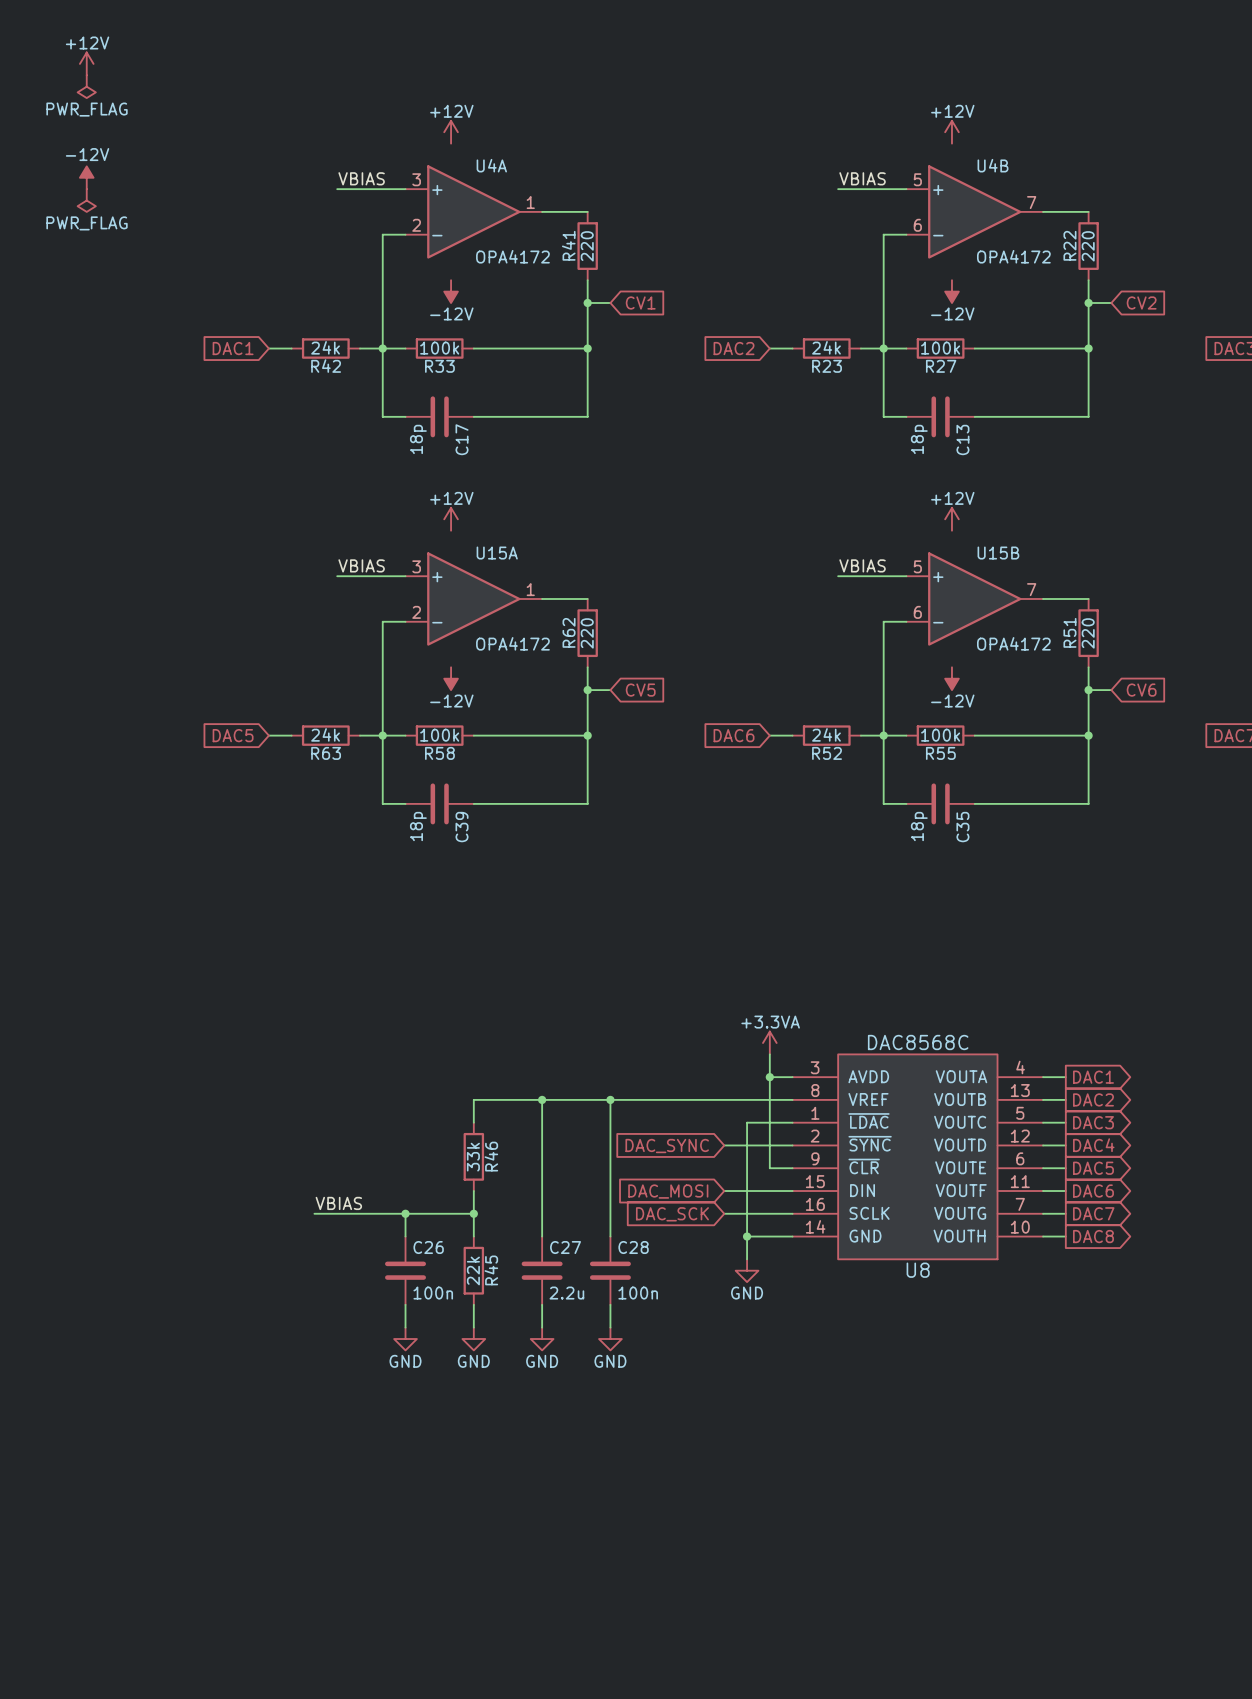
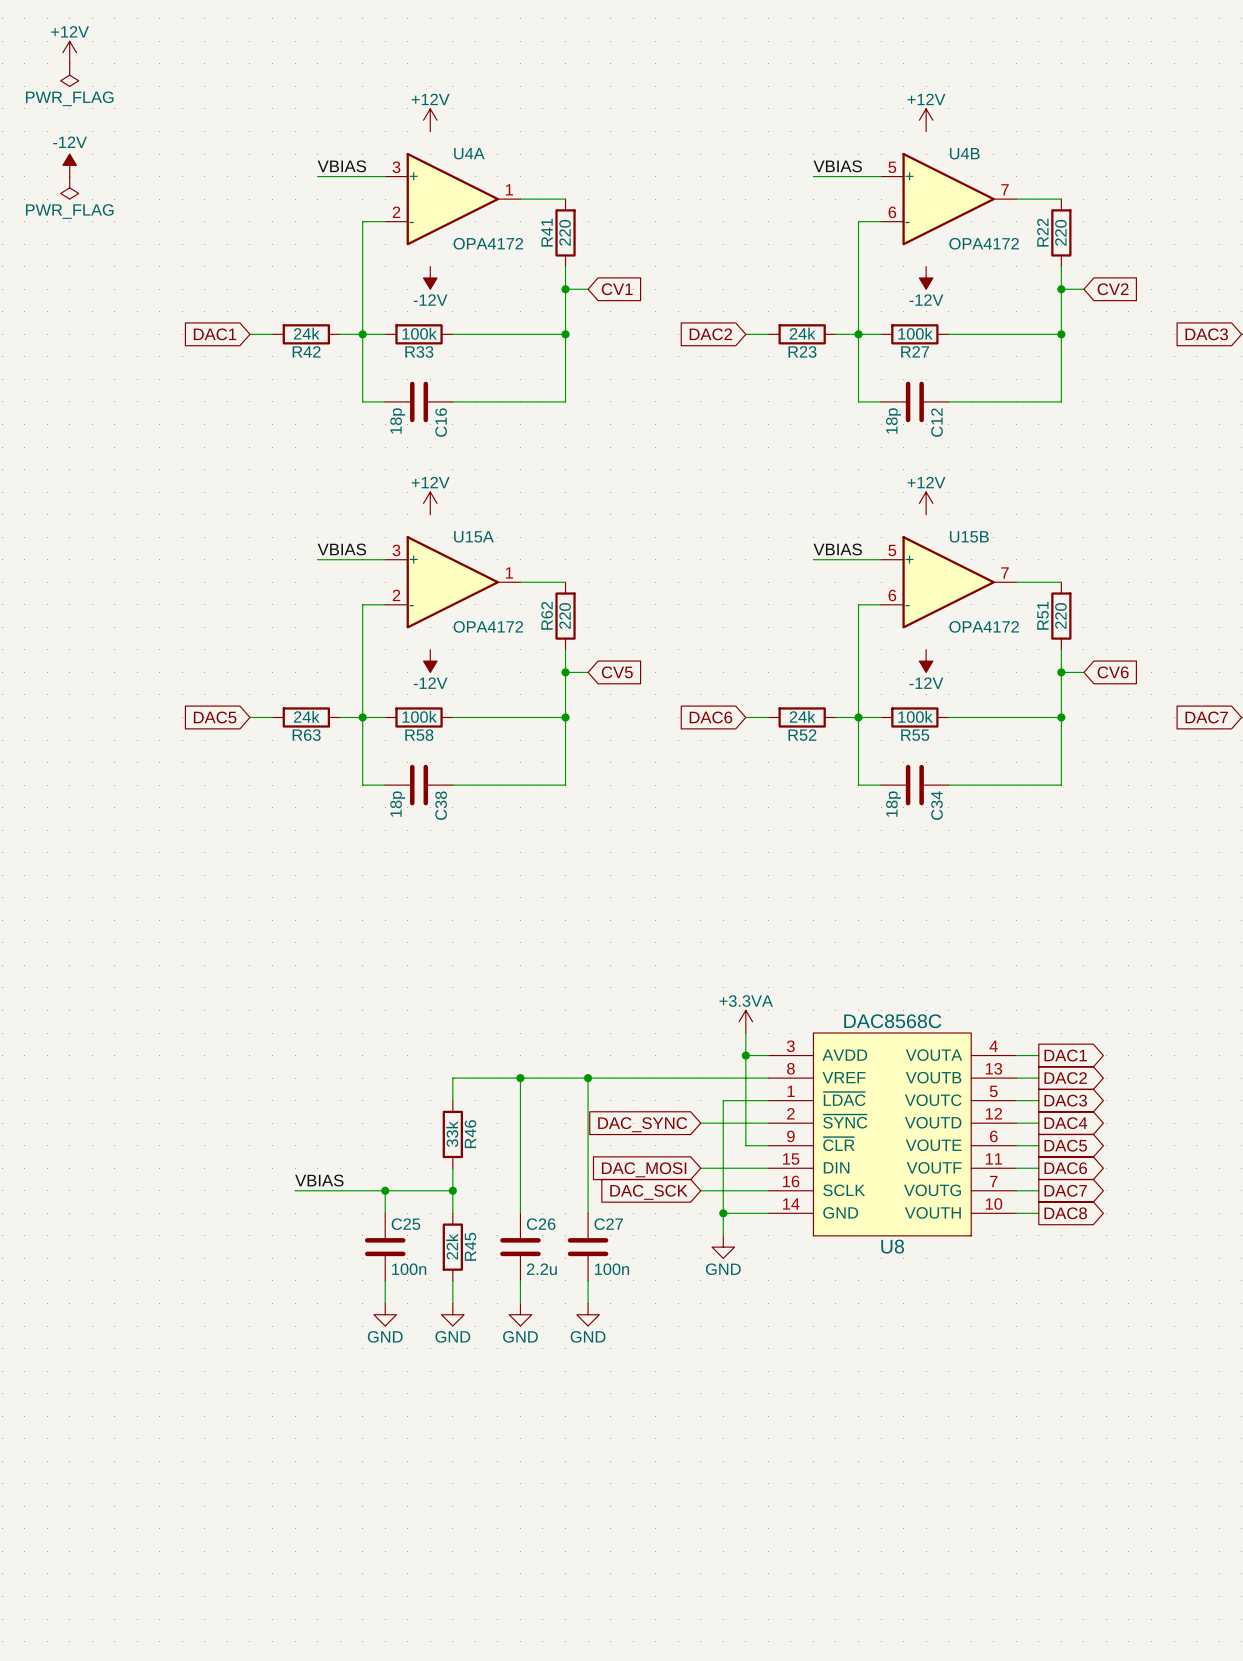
C17 name: C17 (462, 439) -> C16 (441, 422)
C13 name: C13 (962, 439) -> C12 (936, 422)
C39 name: C39 (462, 827) -> C38 (441, 805)
C35 name: C35 (962, 827) -> C34 (936, 805)
C26 name: C26 (428, 1247) -> C25 (405, 1224)
C27 name: C27 (565, 1247) -> C26 (541, 1224)
C28 name: C28 (633, 1247) -> C27 (608, 1224)

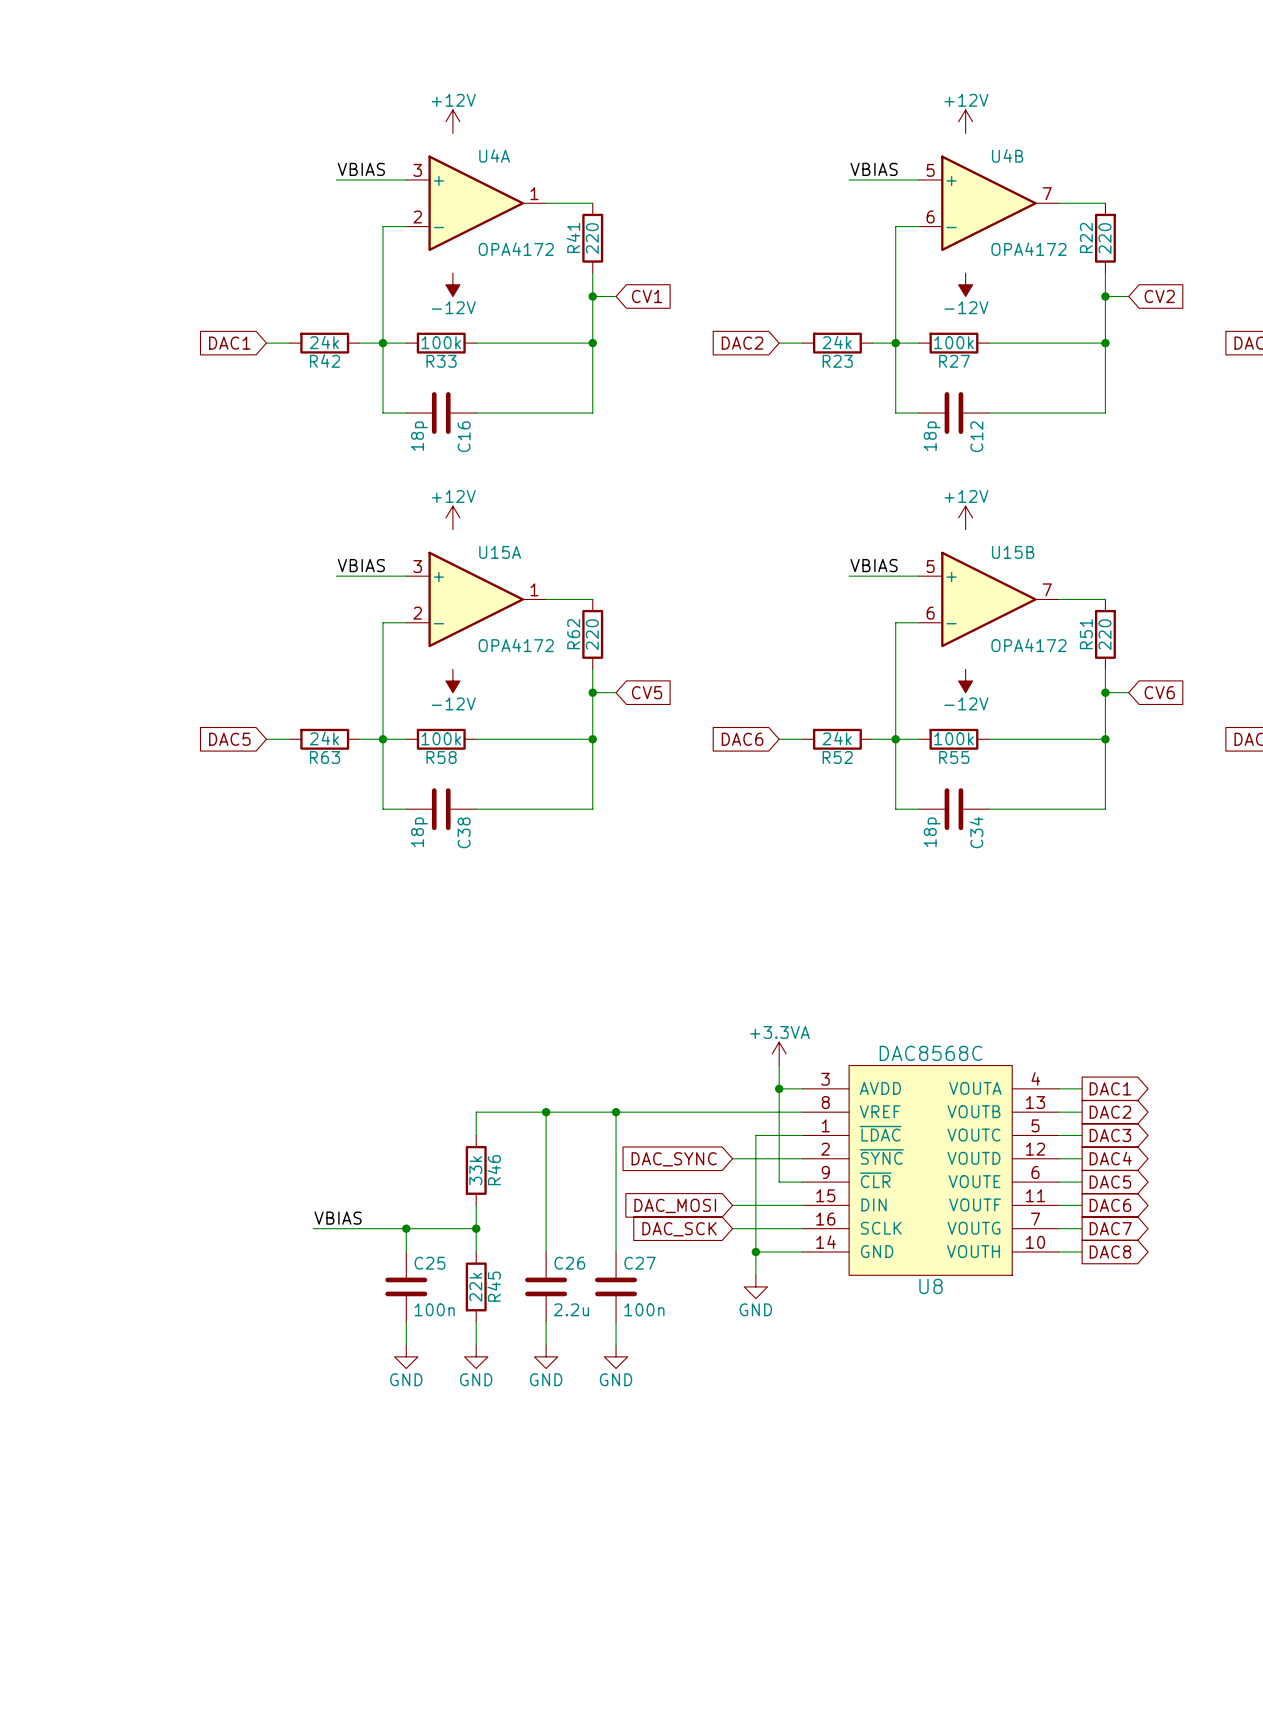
power symbol: +12V (69, 52) -> none
power symbol: PWR_FLAG (69, 75) -> none
power symbol: -12V (69, 165) -> none
power symbol: PWR_FLAG (69, 187) -> none

